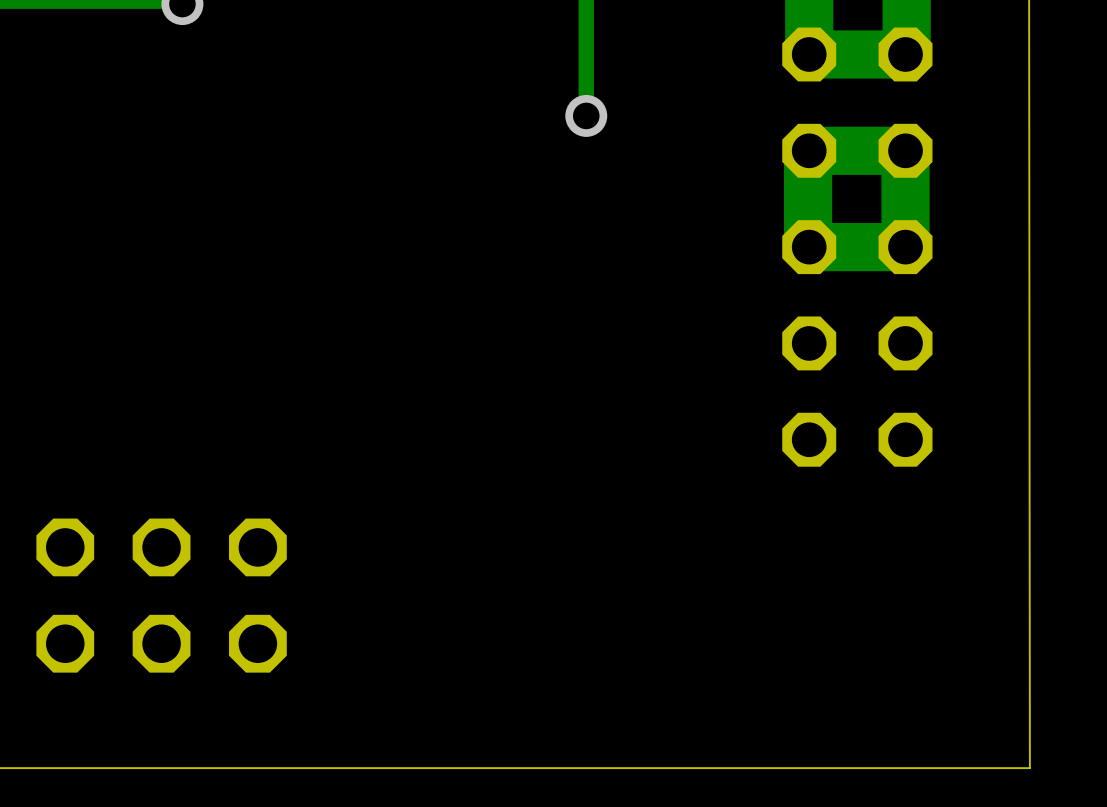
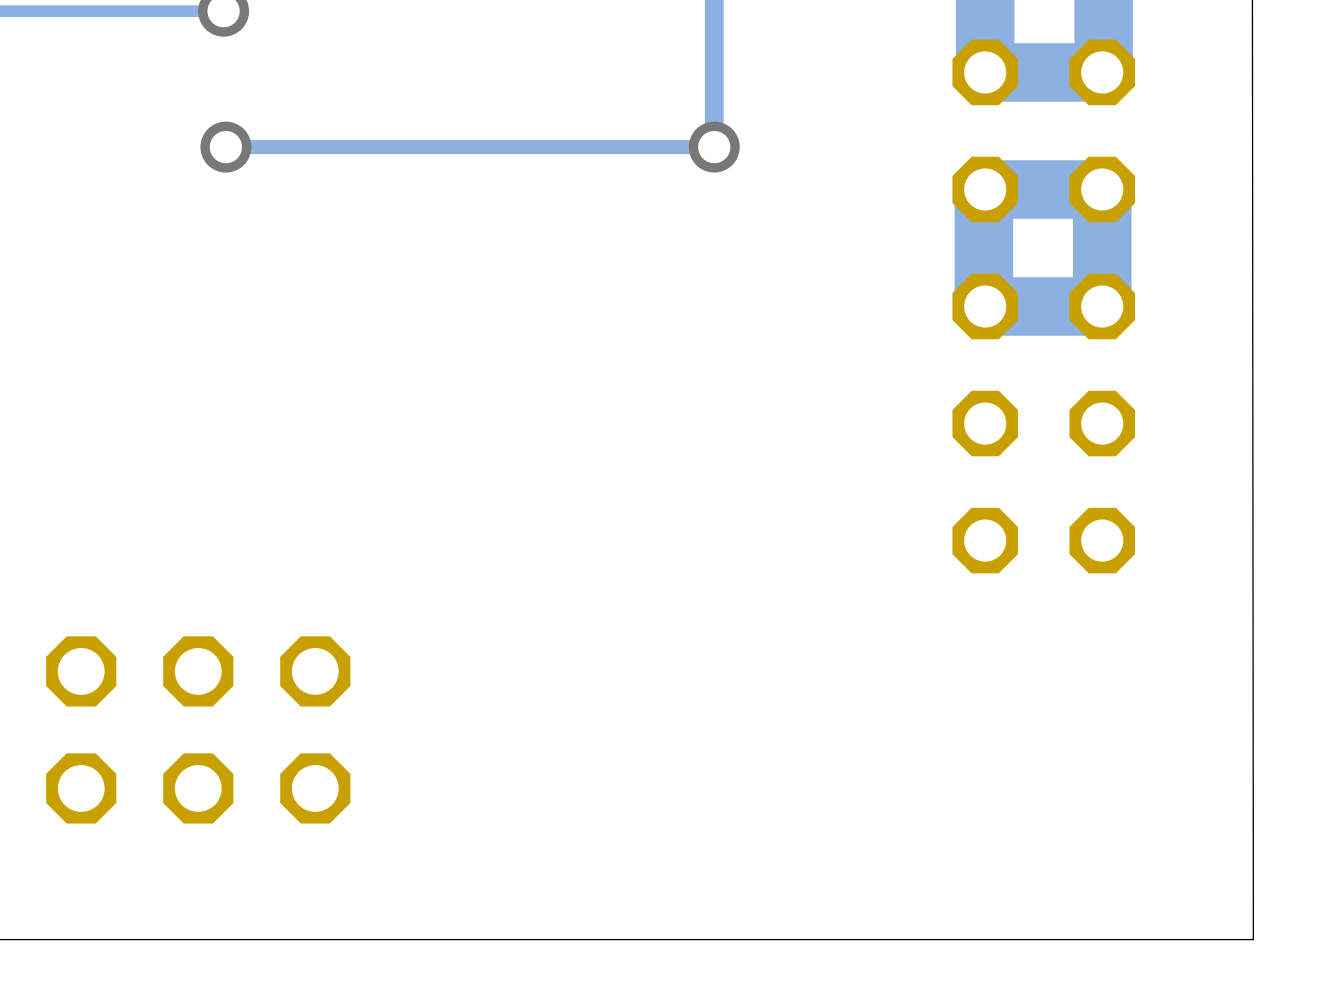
via: none -> (225, 147)
track: none -> (714, 147) (225, 147)

